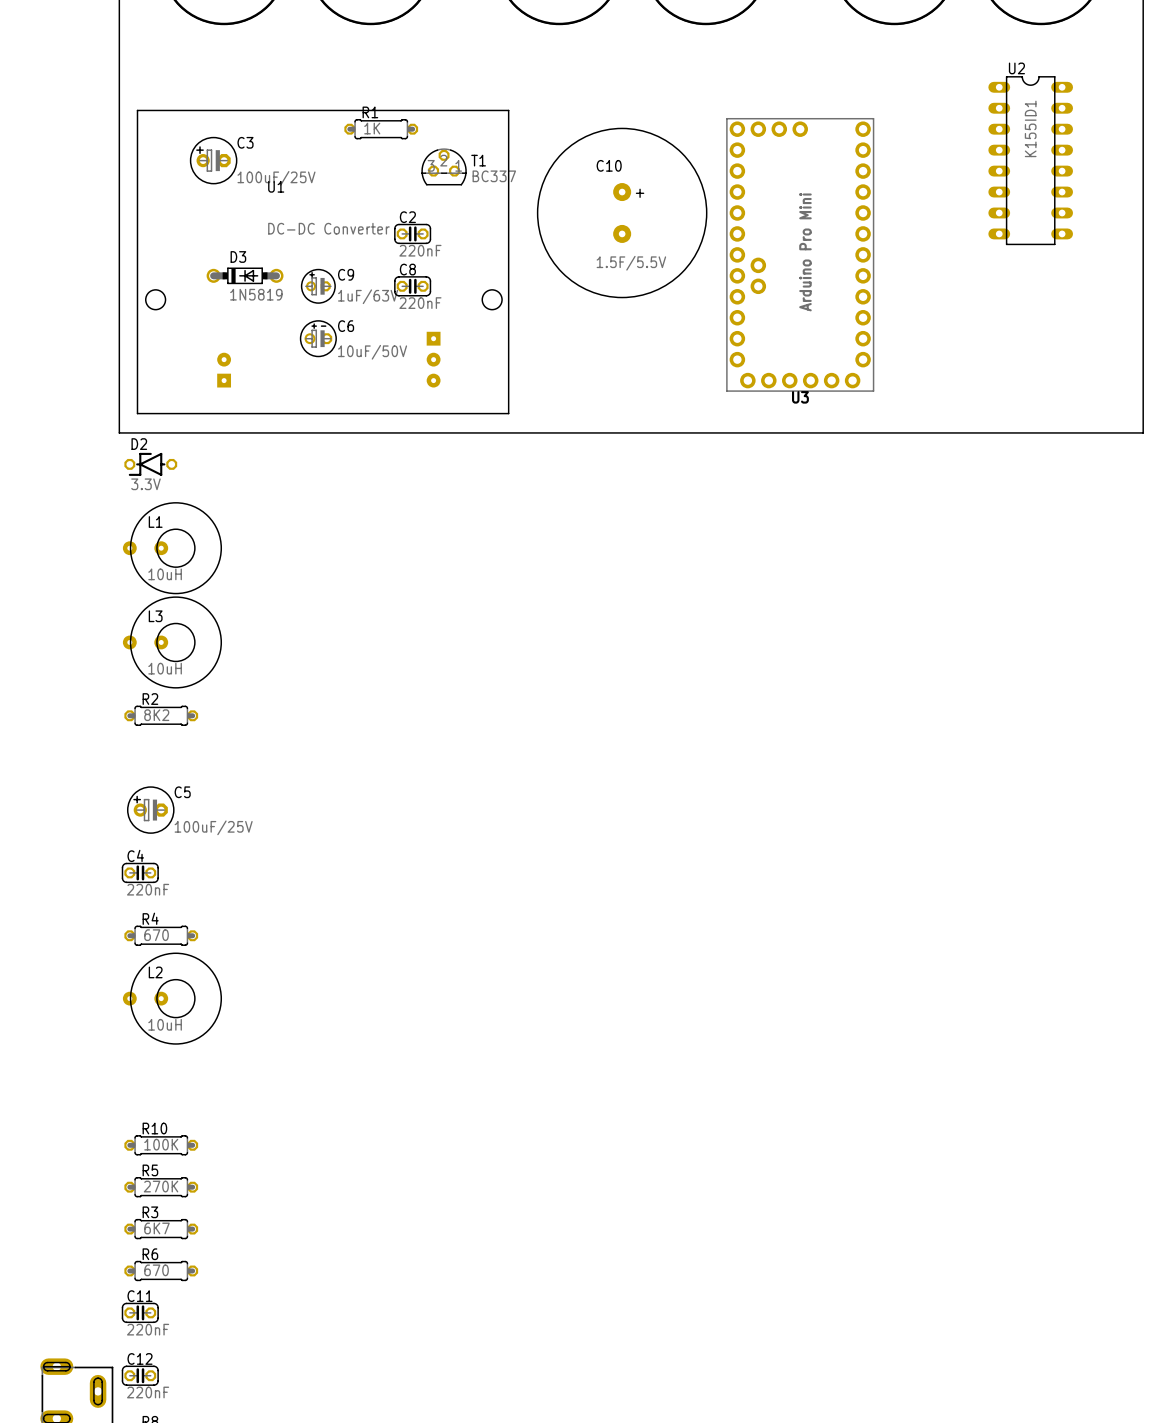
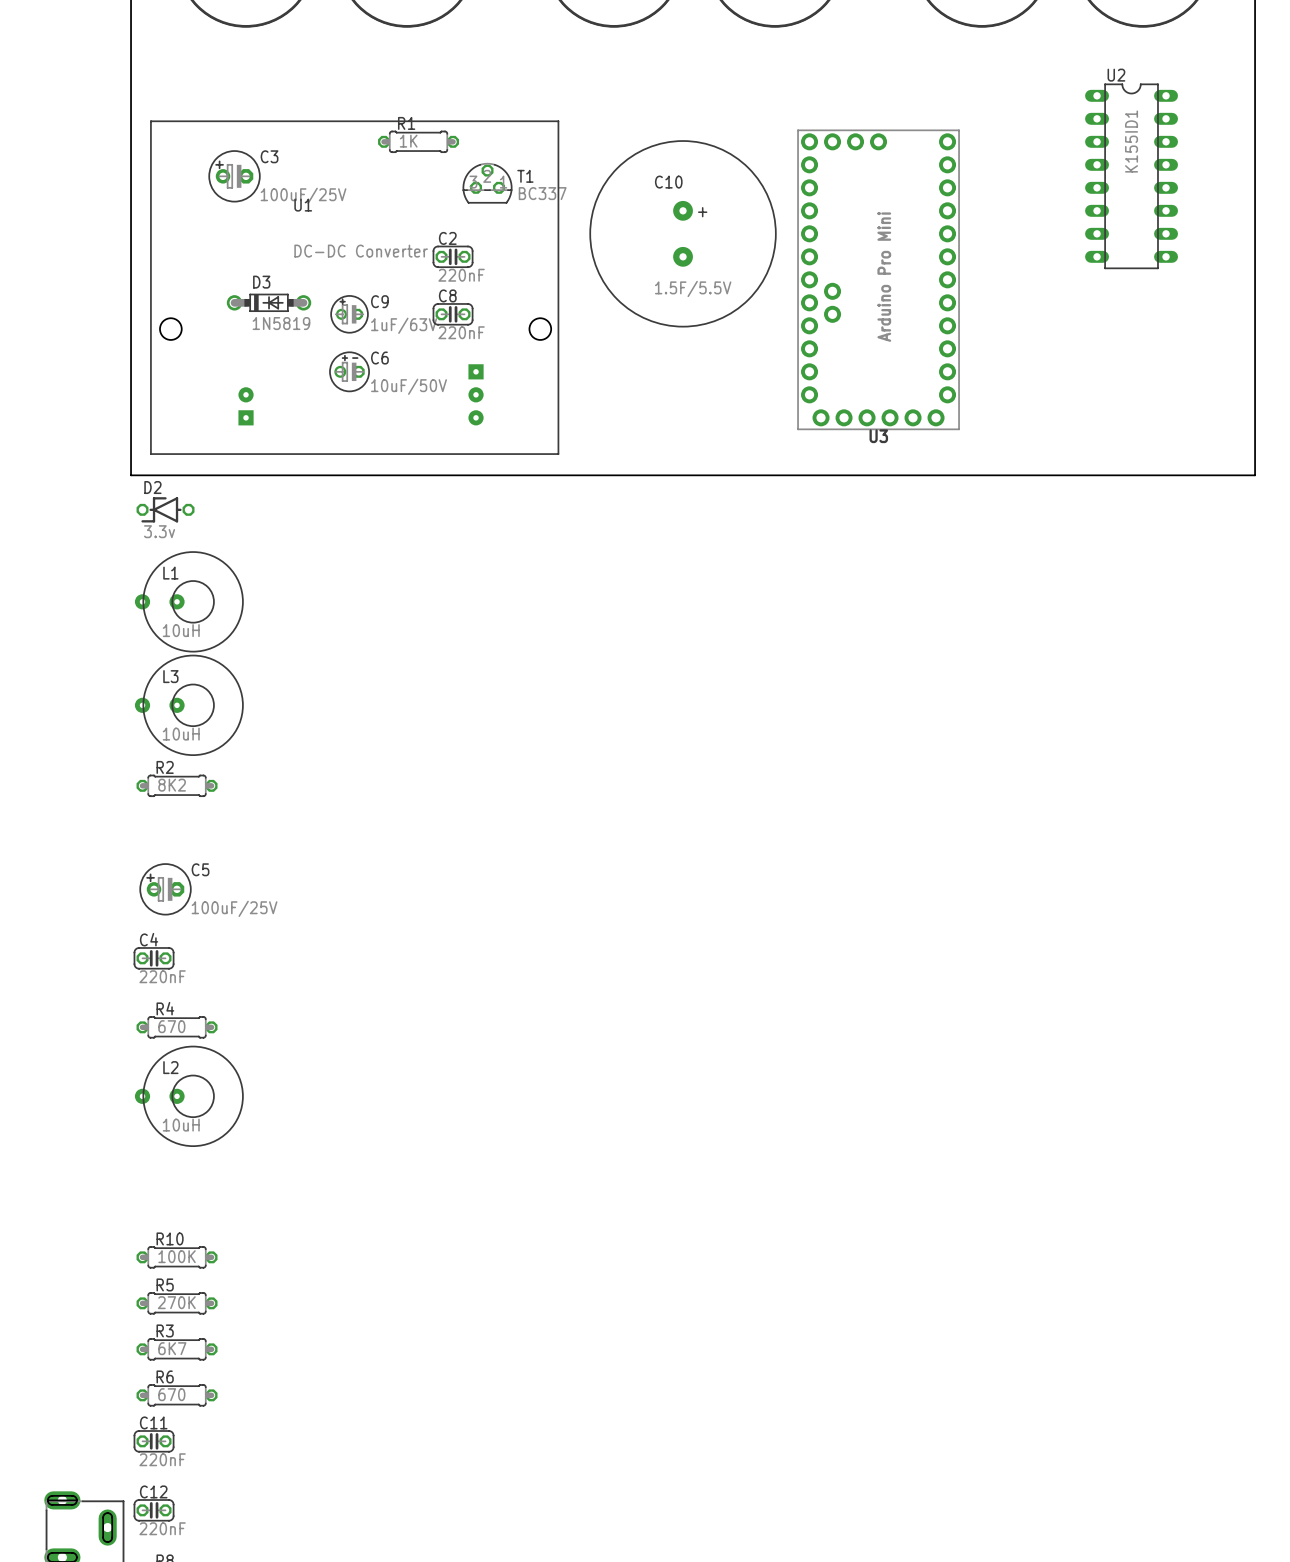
D2 value: 3.3V (146, 484) -> 3.3v (159, 531)

